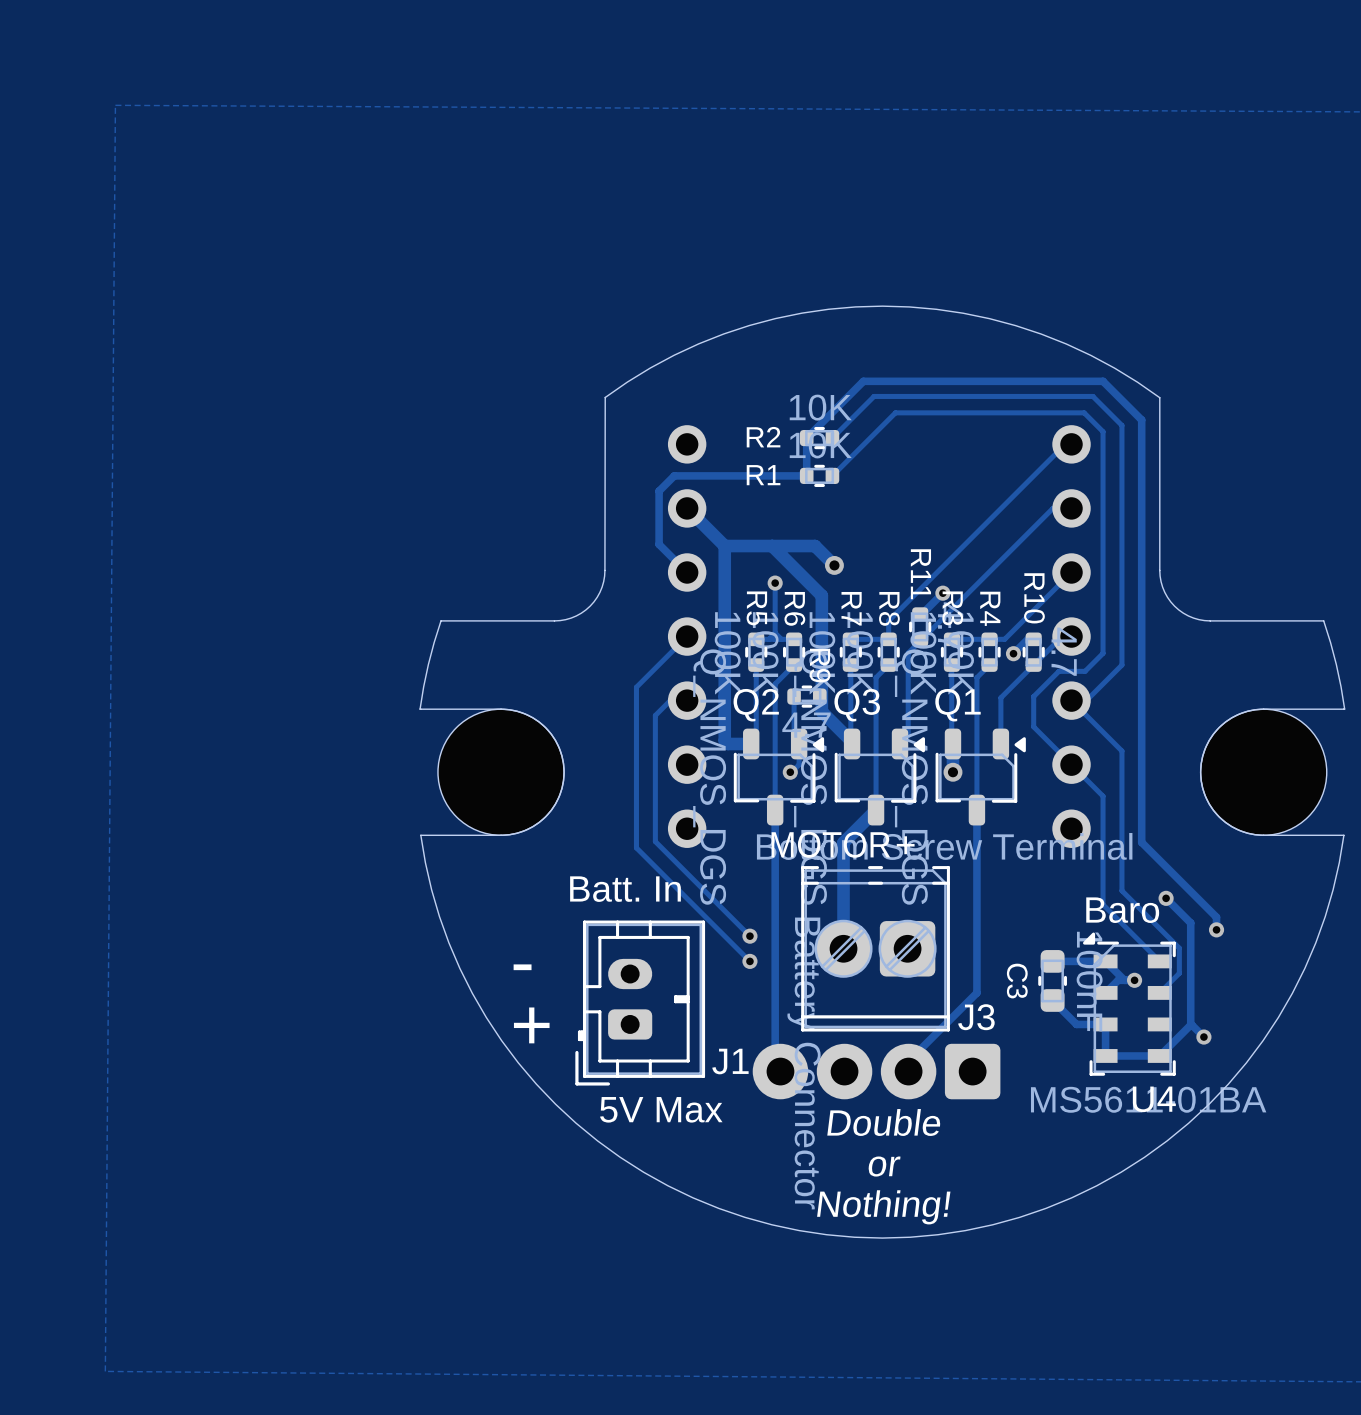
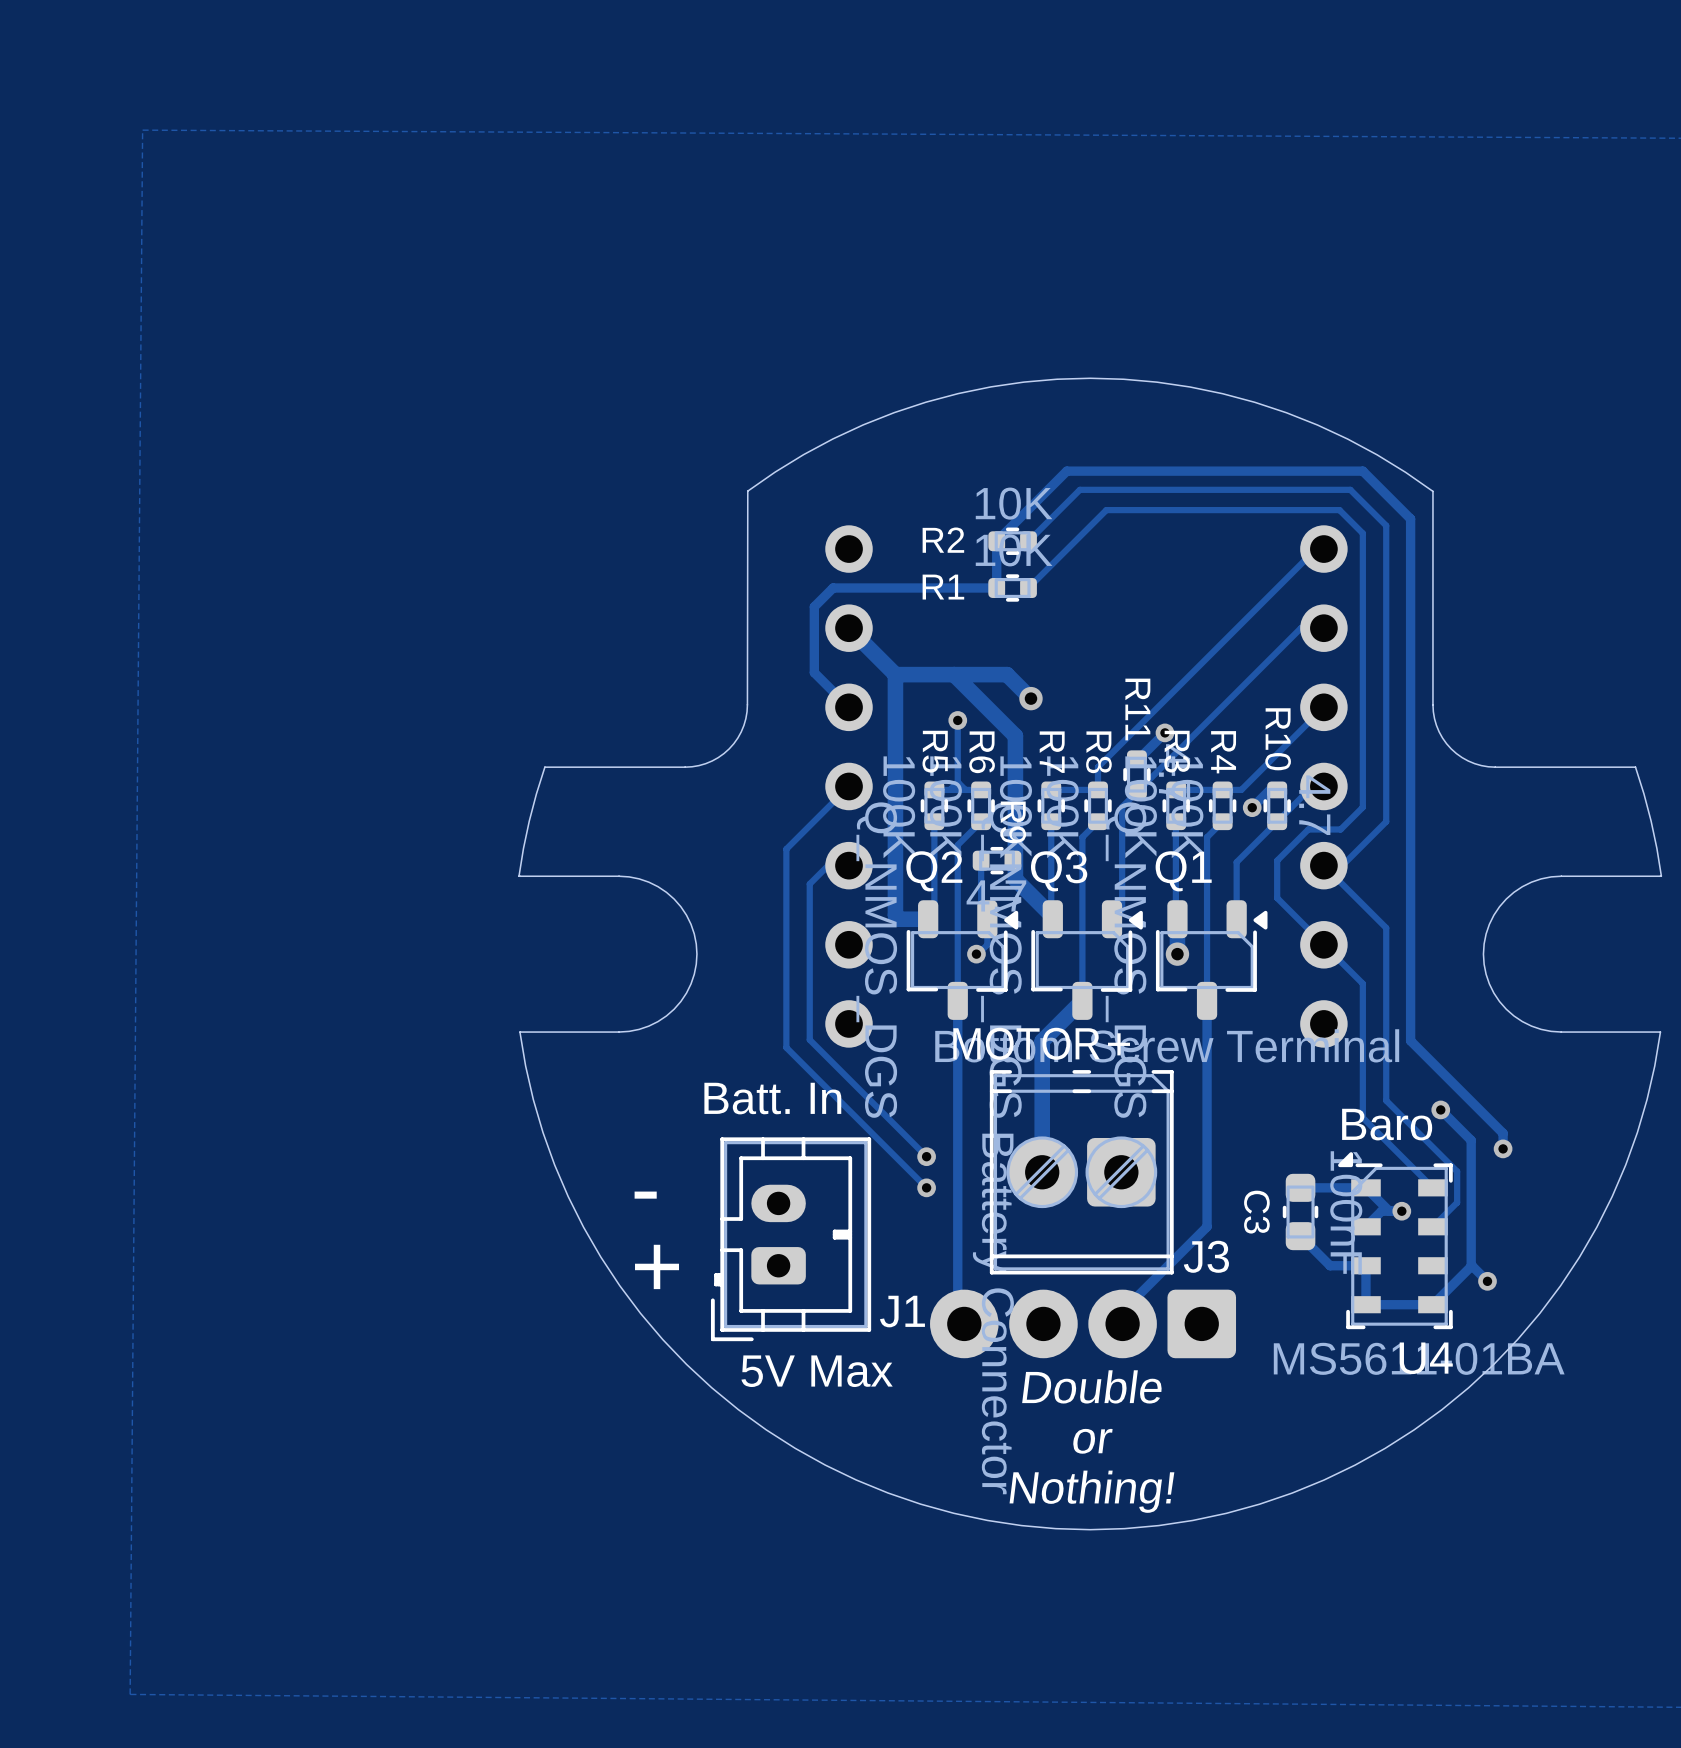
part: (501, 772) -> none
part: (1263, 772) -> none

